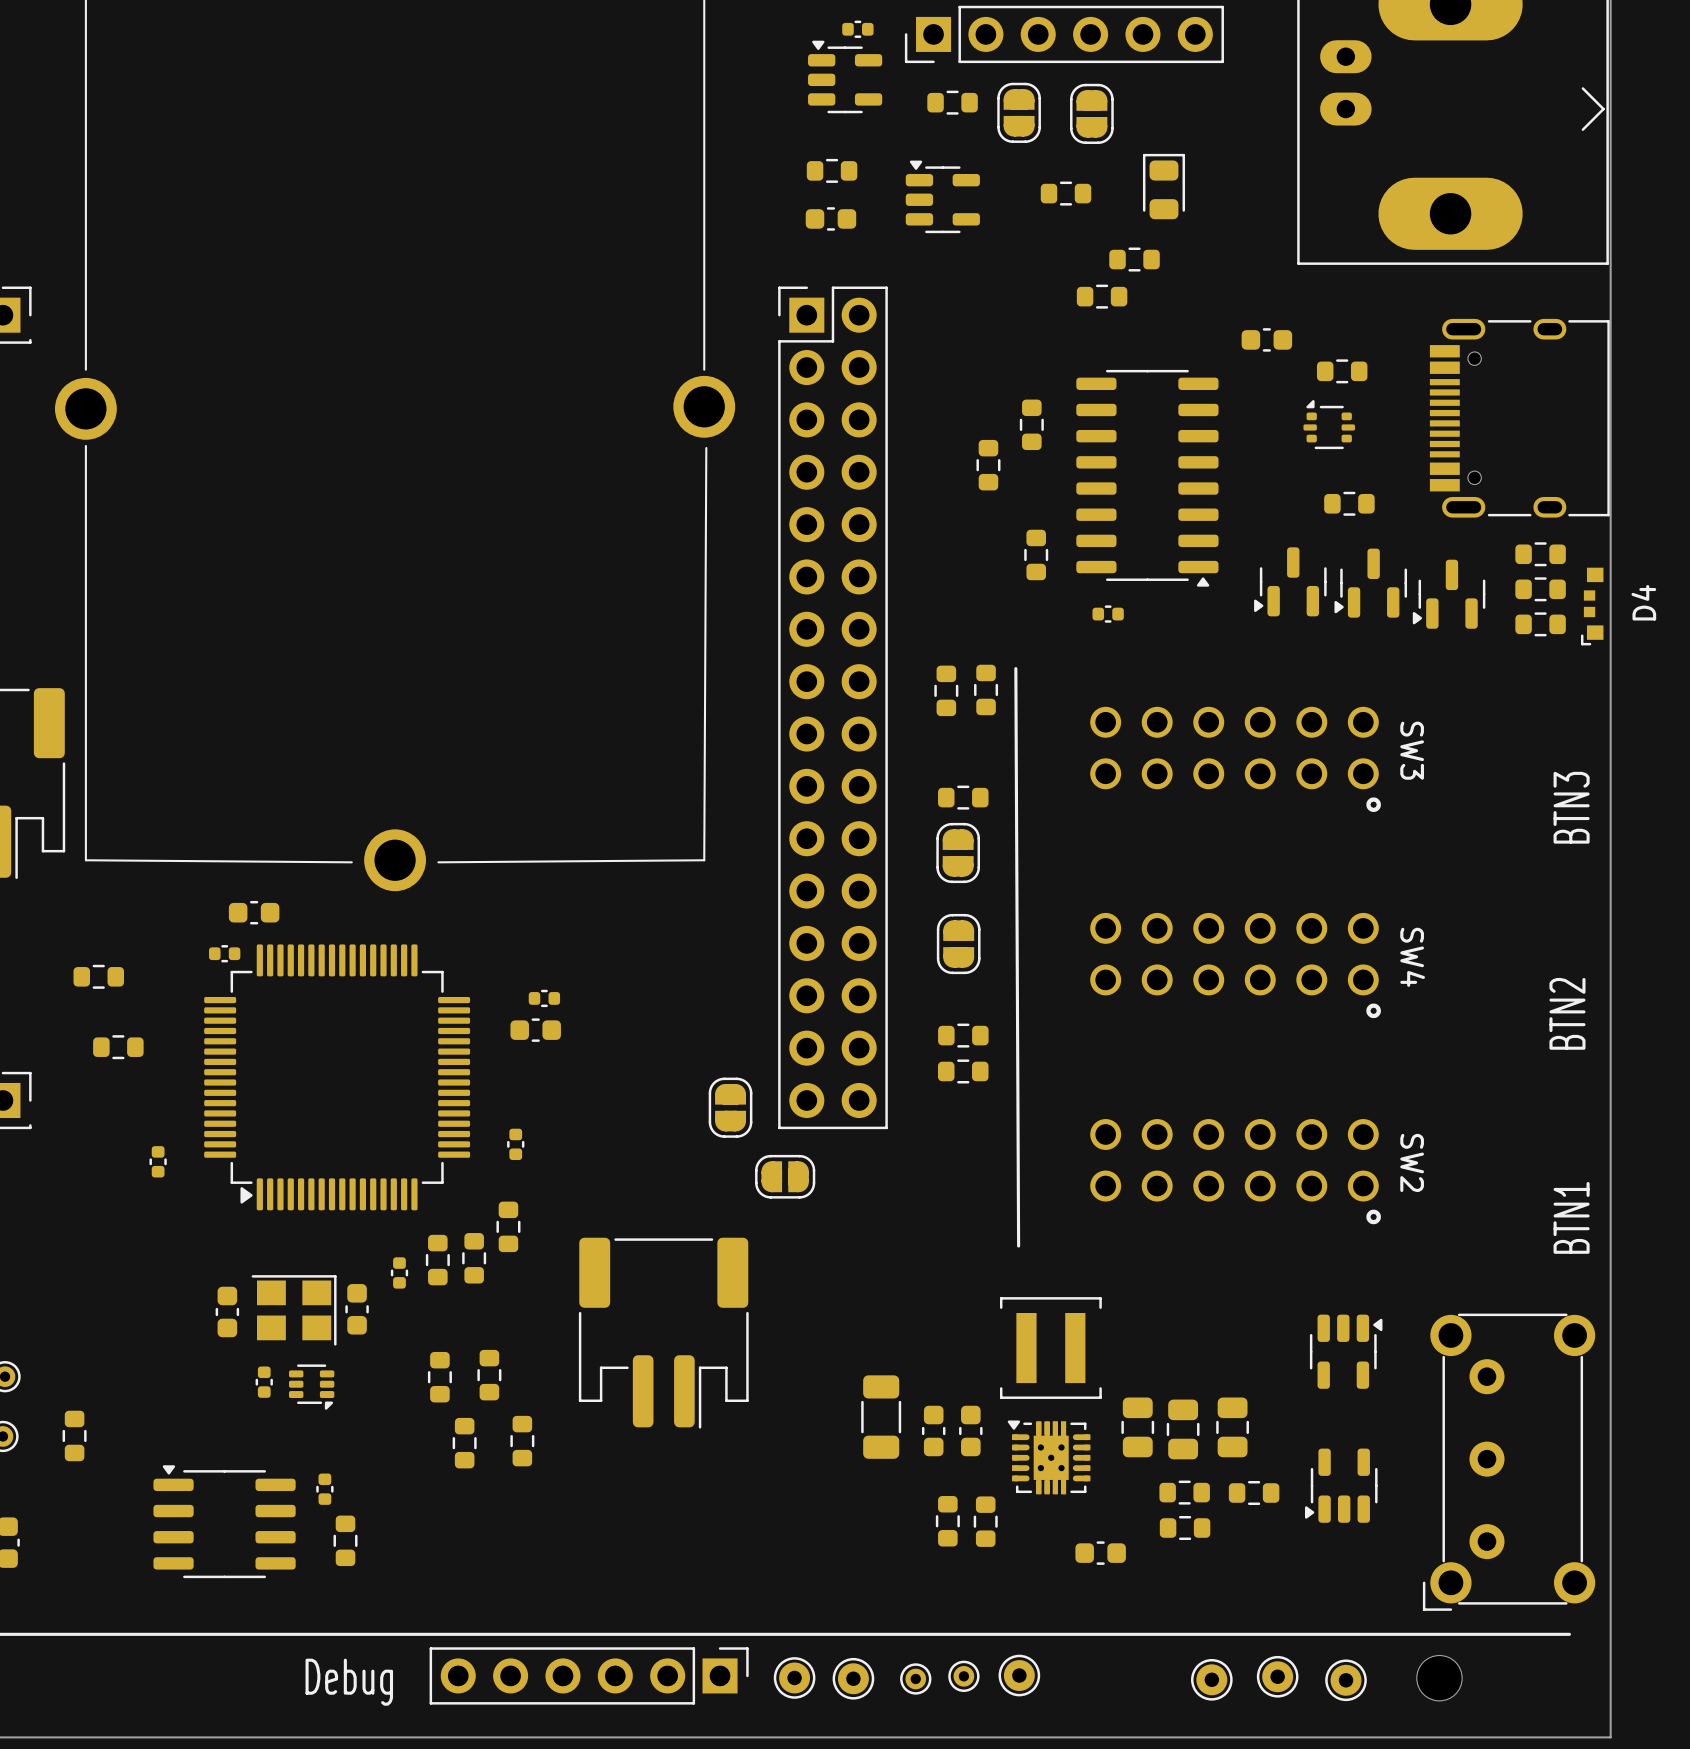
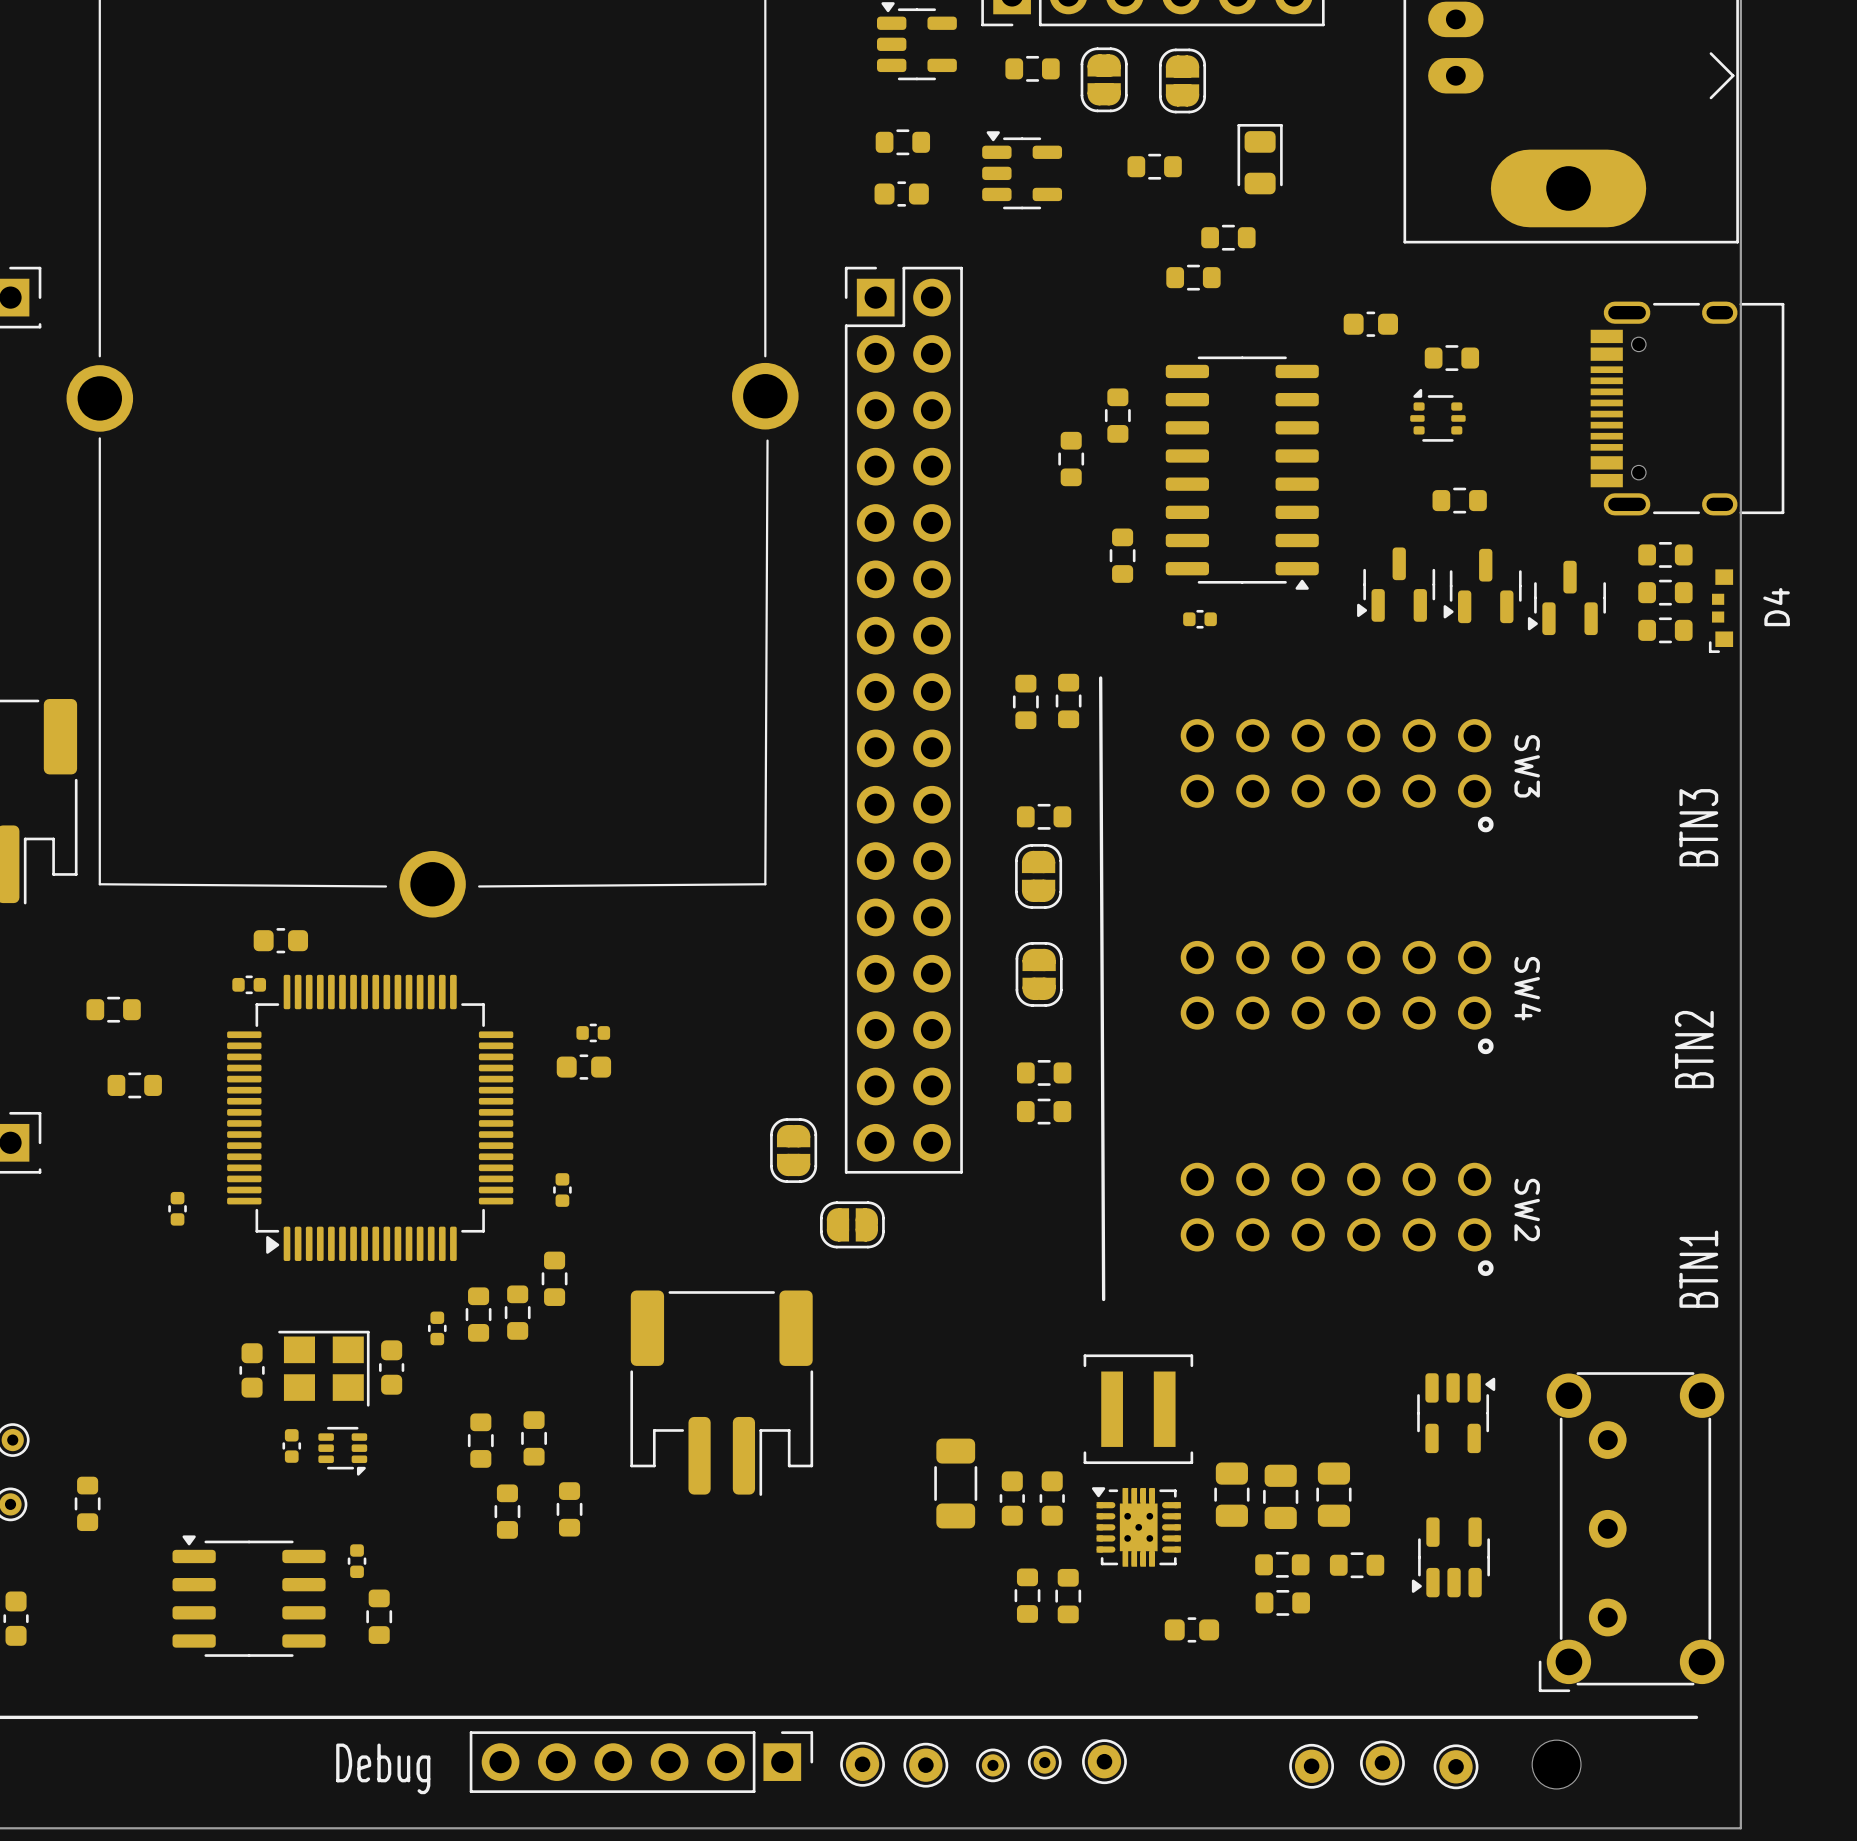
part position: (1519, 418) -> (1687, 408)

